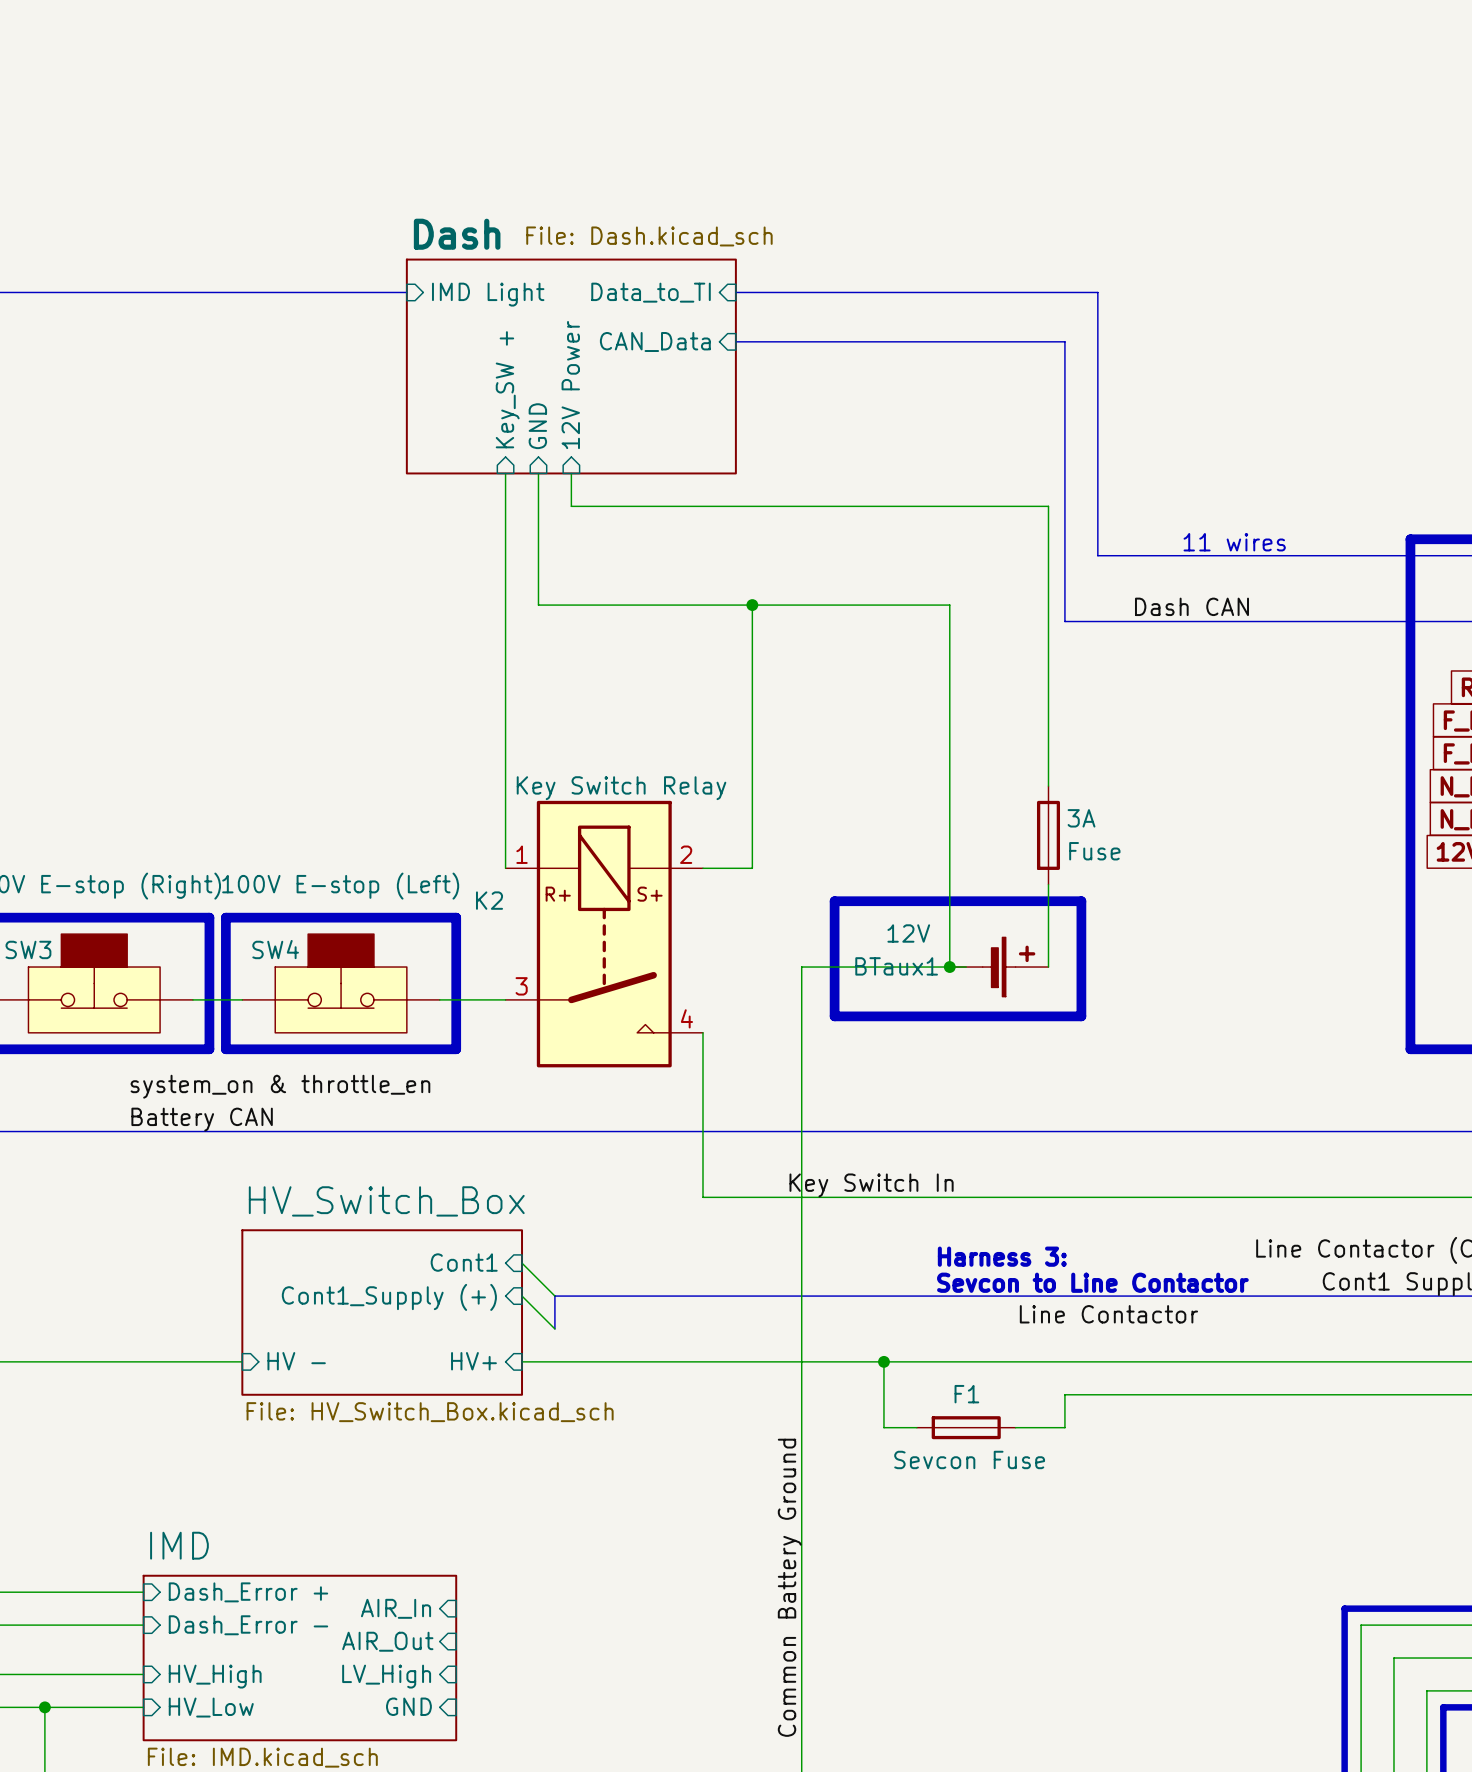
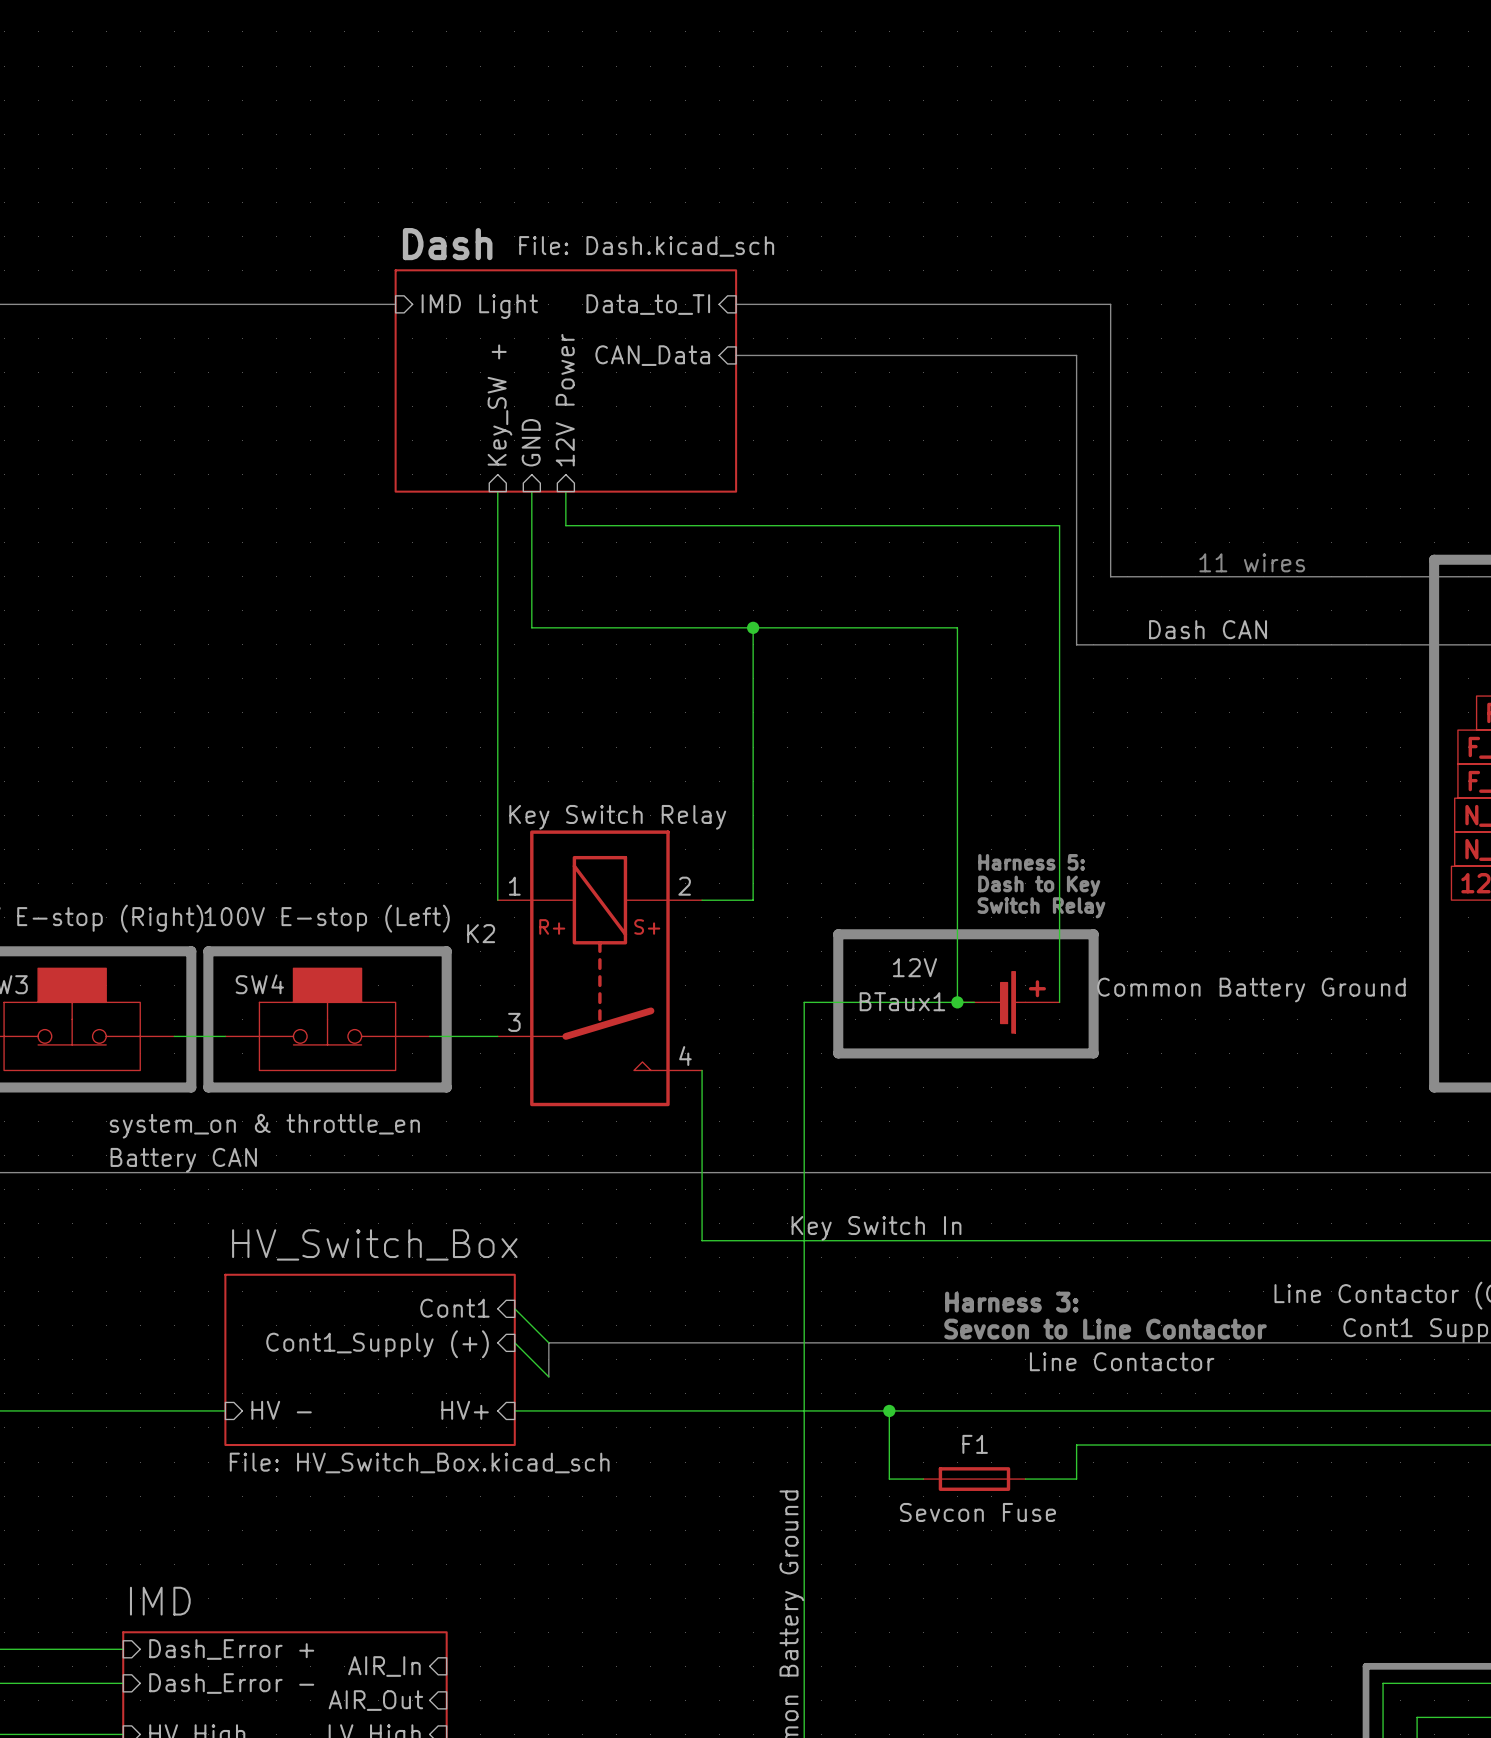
text: none -> Harness 5: (1031, 862)
3A: Fuse (1048, 835) -> none
text: none -> Dash to Key (1039, 886)
text: none -> Switch Relay (1041, 907)
label: none -> Common Battery Ground (1251, 990)

